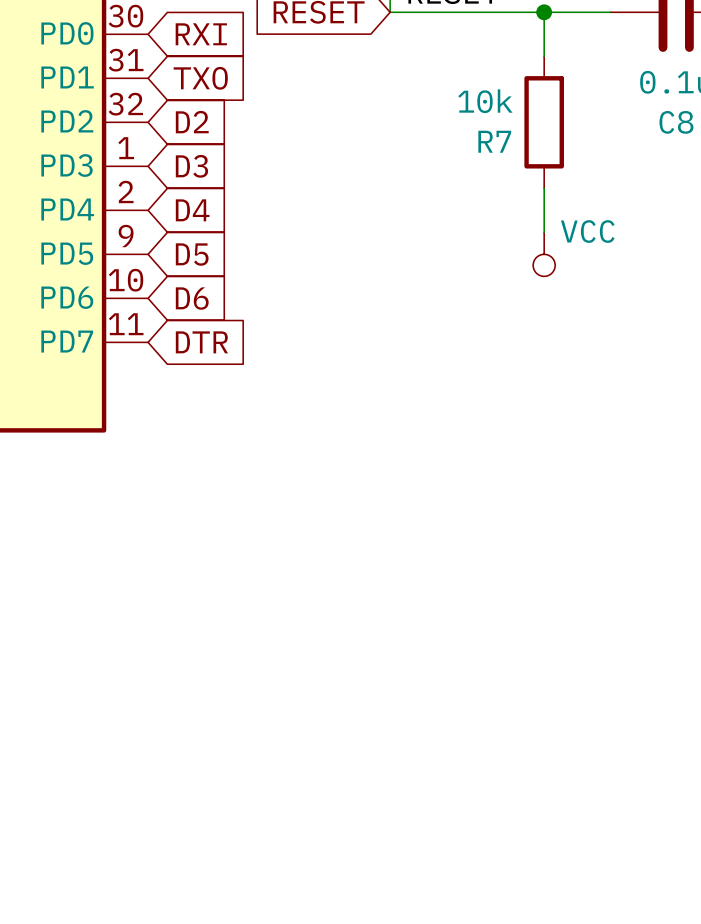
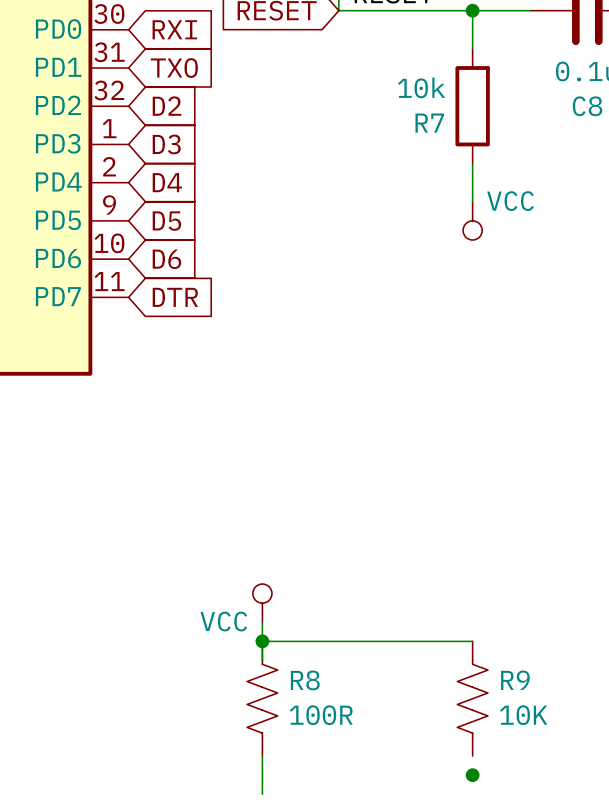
power symbol: none -> VCC (262, 603)
wire: none -> (262, 622) (262, 660)
wire: none -> (262, 641) (472, 641)
junction: none -> (262, 641)
R8: none -> 100R (262, 698)
R9: none -> 10K (472, 698)
wire: none -> (262, 756) (262, 794)
junction: none -> (472, 775)

